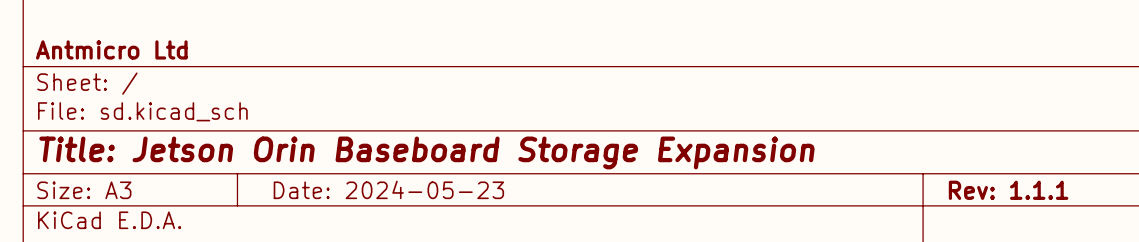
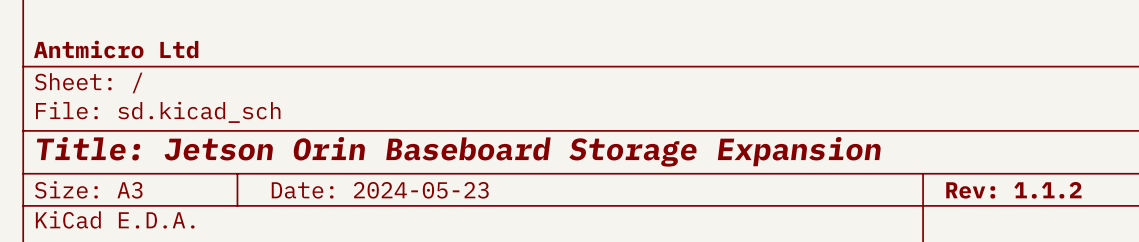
title block: Rev: 1.1.1 (1008, 190) -> Rev: 1.1.2 (1013, 190)

